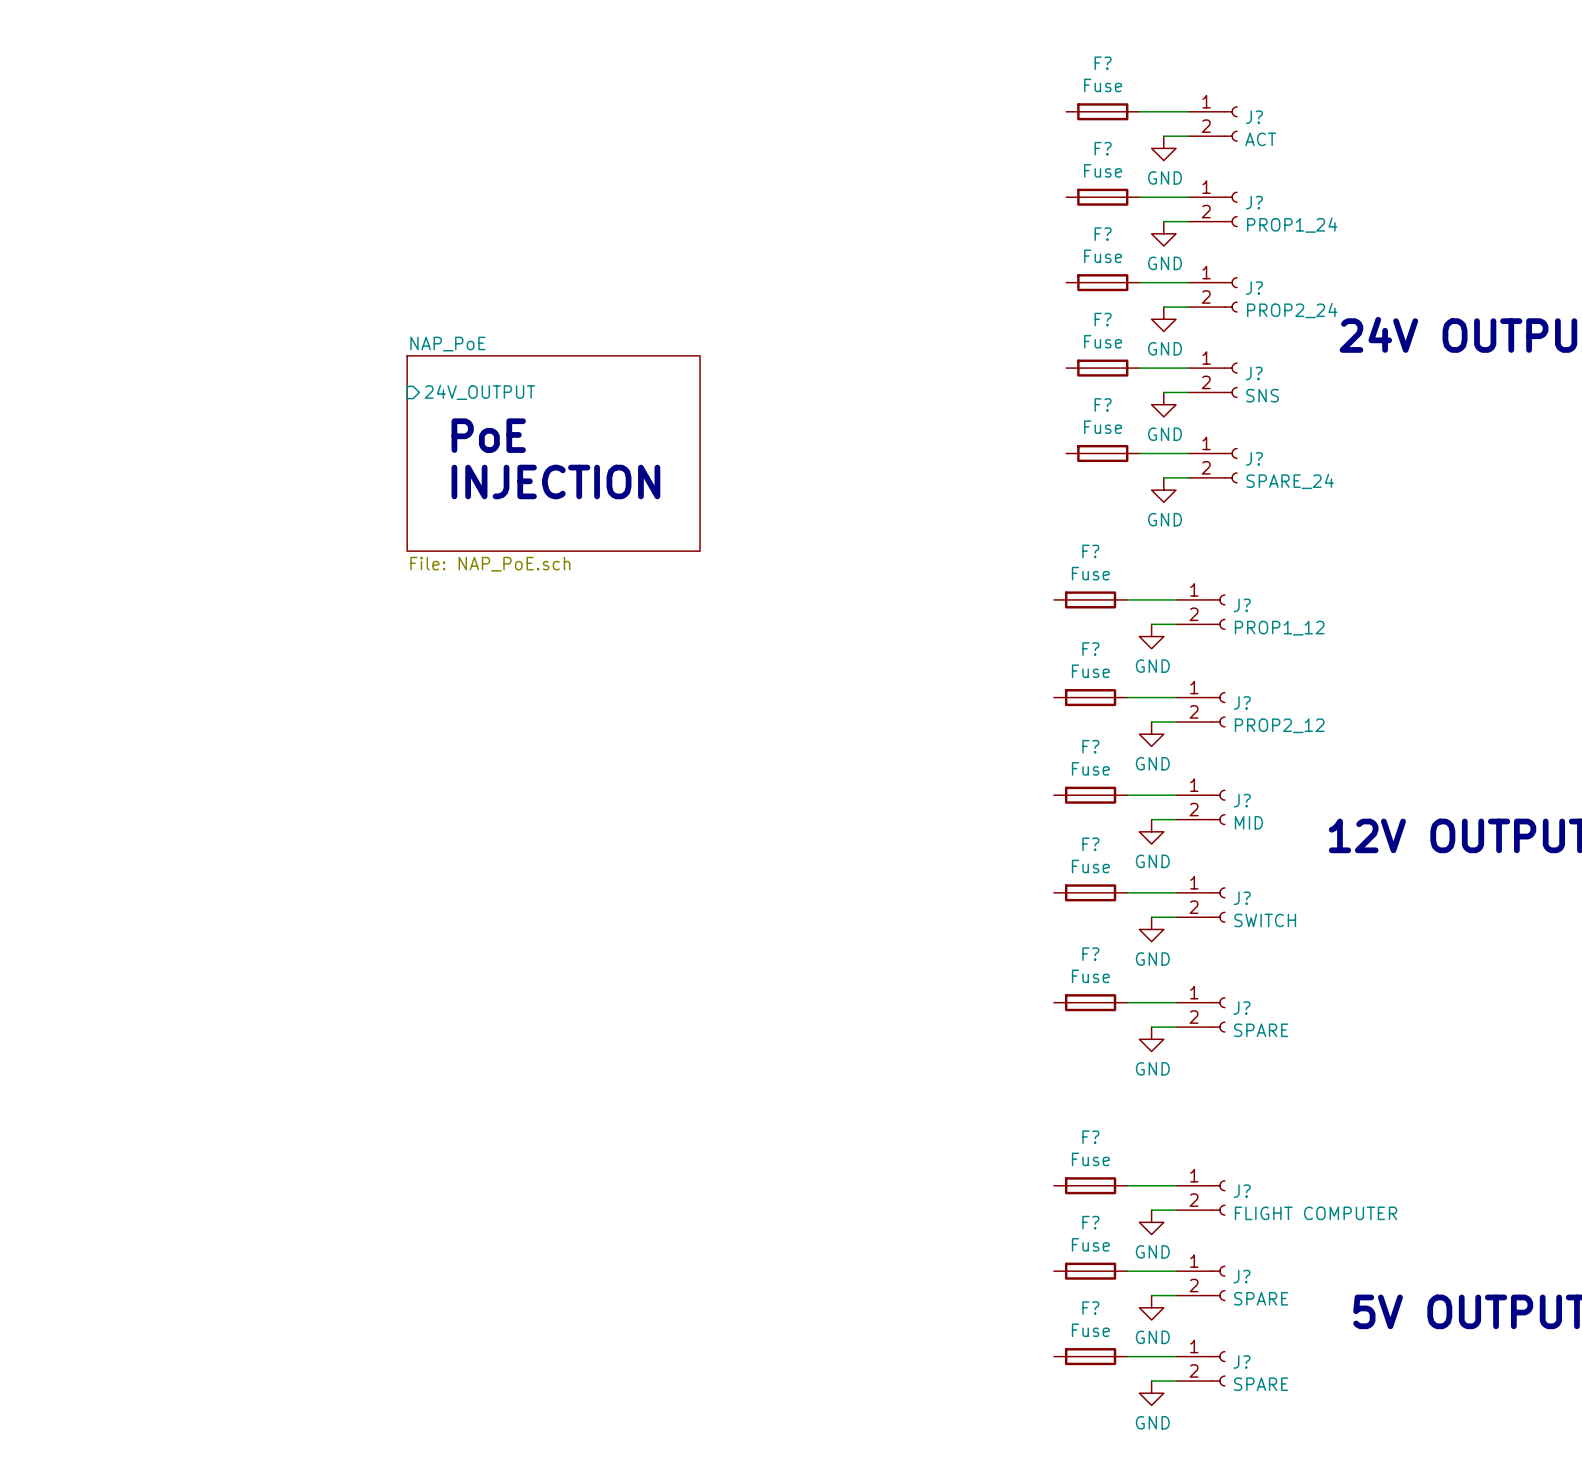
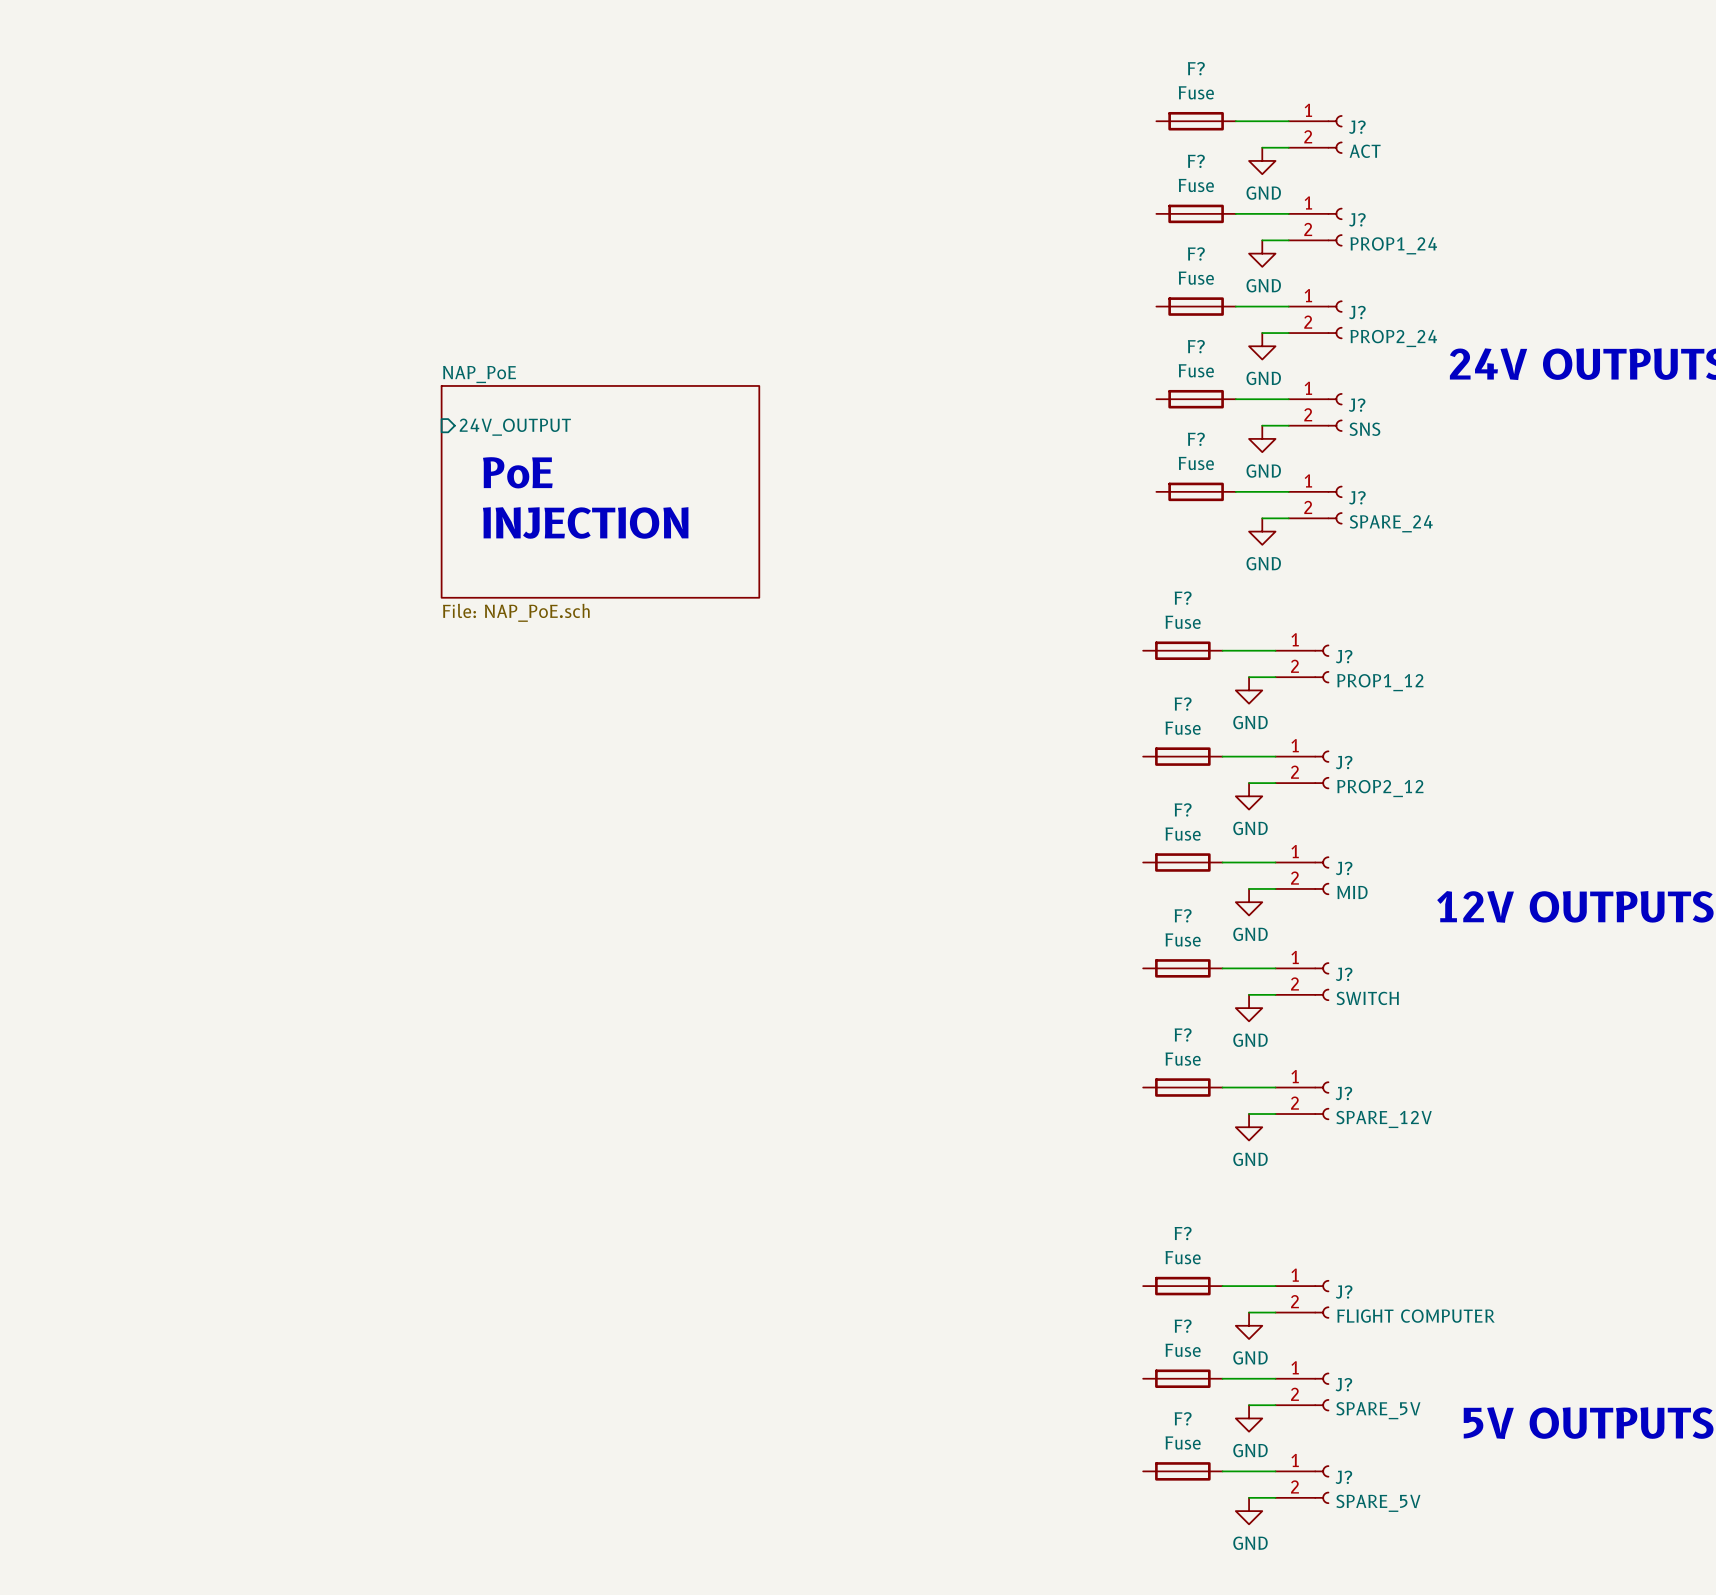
J? value: SPARE (1261, 1030) -> SPARE_12V (1384, 1119)
J? value: SPARE (1261, 1298) -> SPARE_5V (1378, 1410)
J? value: SPARE (1261, 1384) -> SPARE_5V (1378, 1503)

